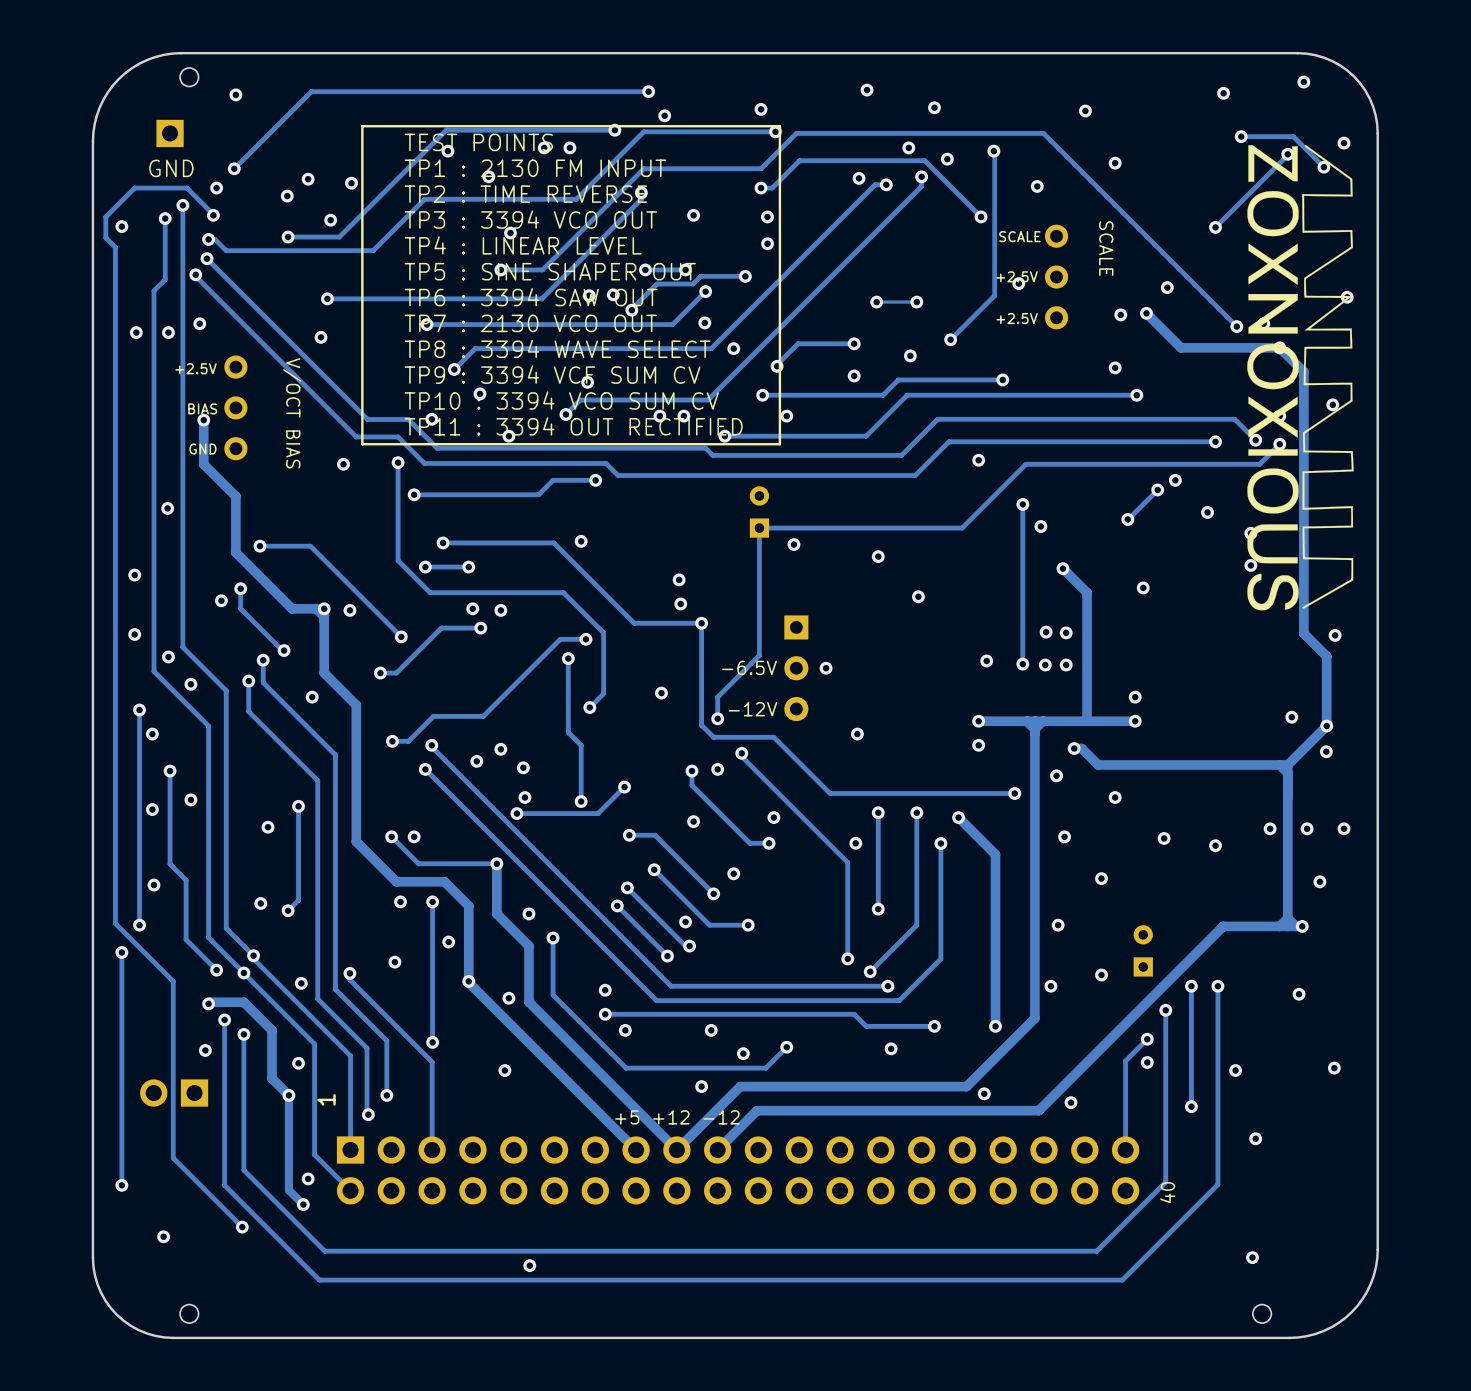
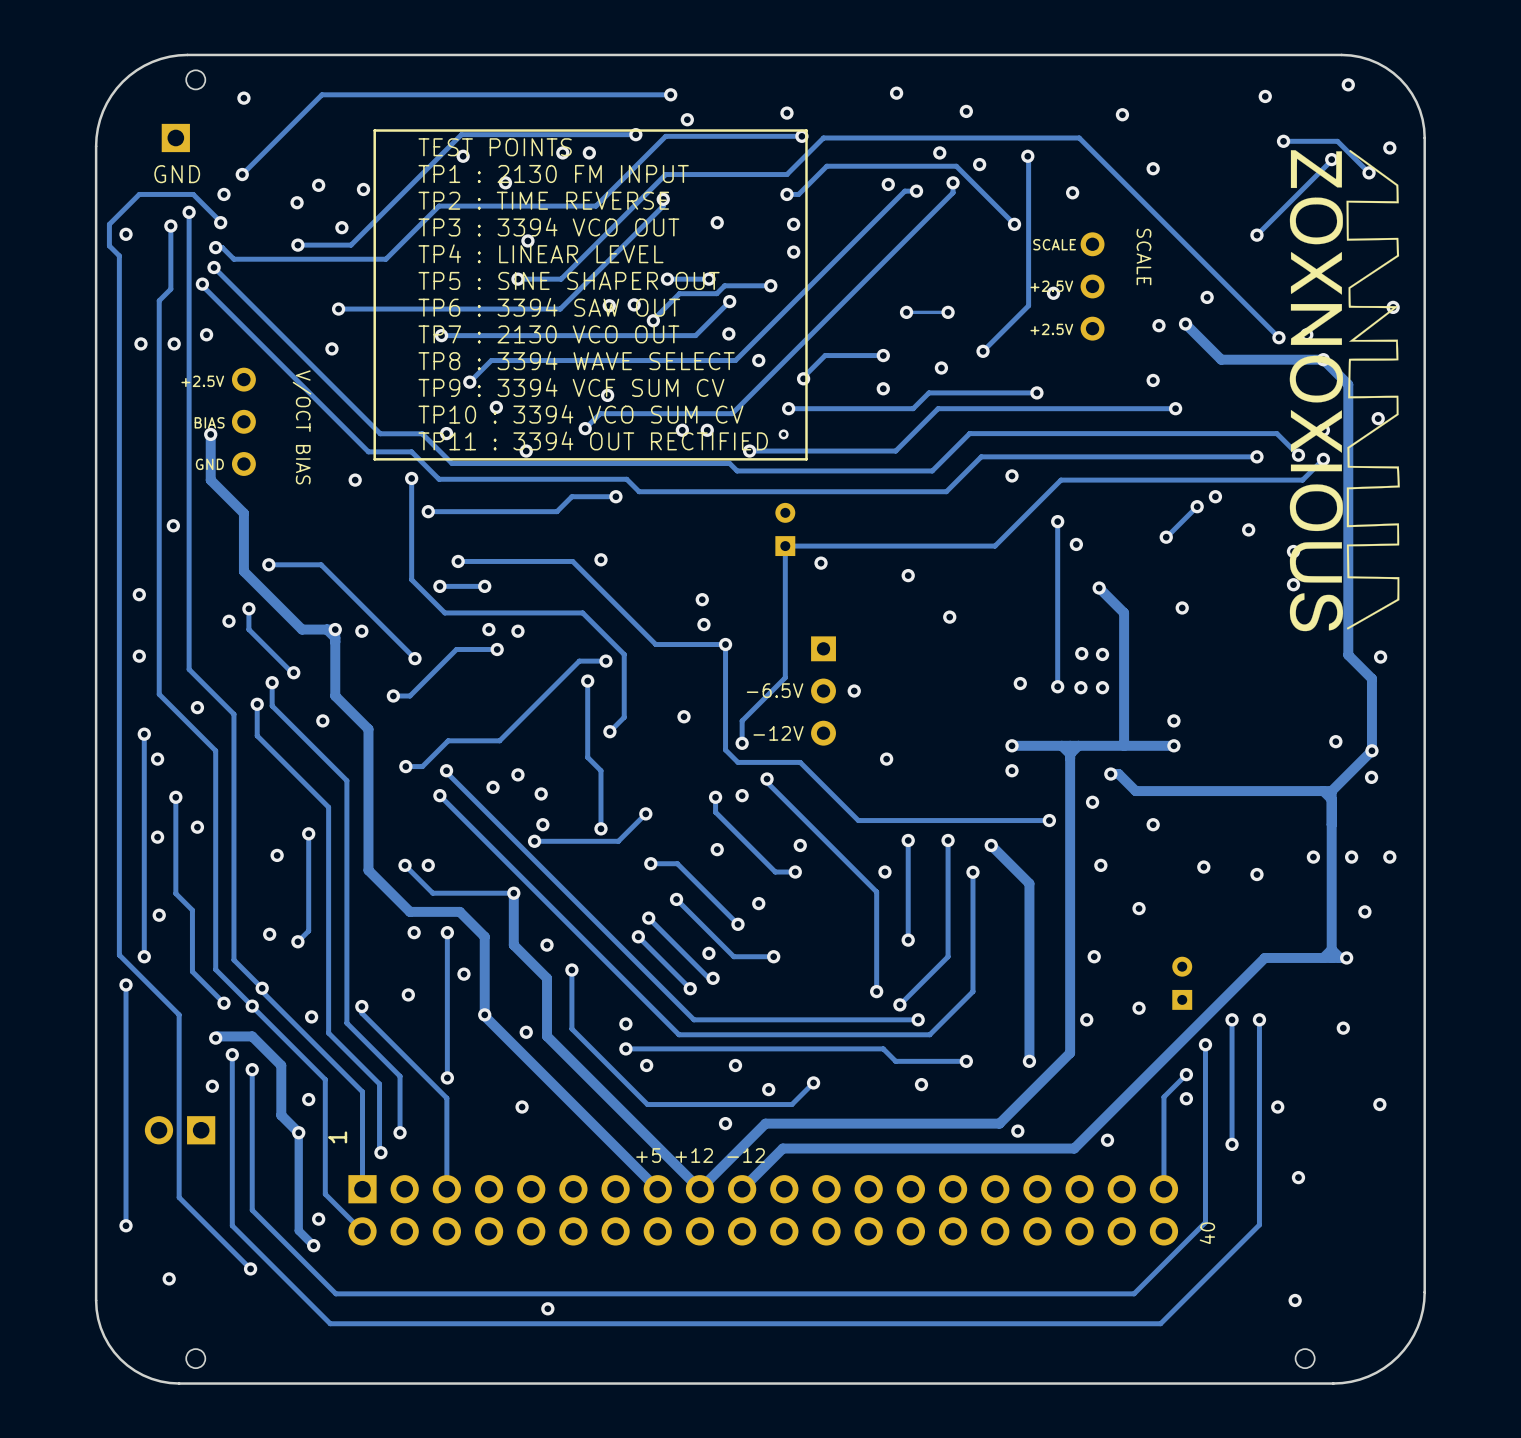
via: (786, 416) -> none
via: none -> (783, 434)
via: (168, 656) -> none

